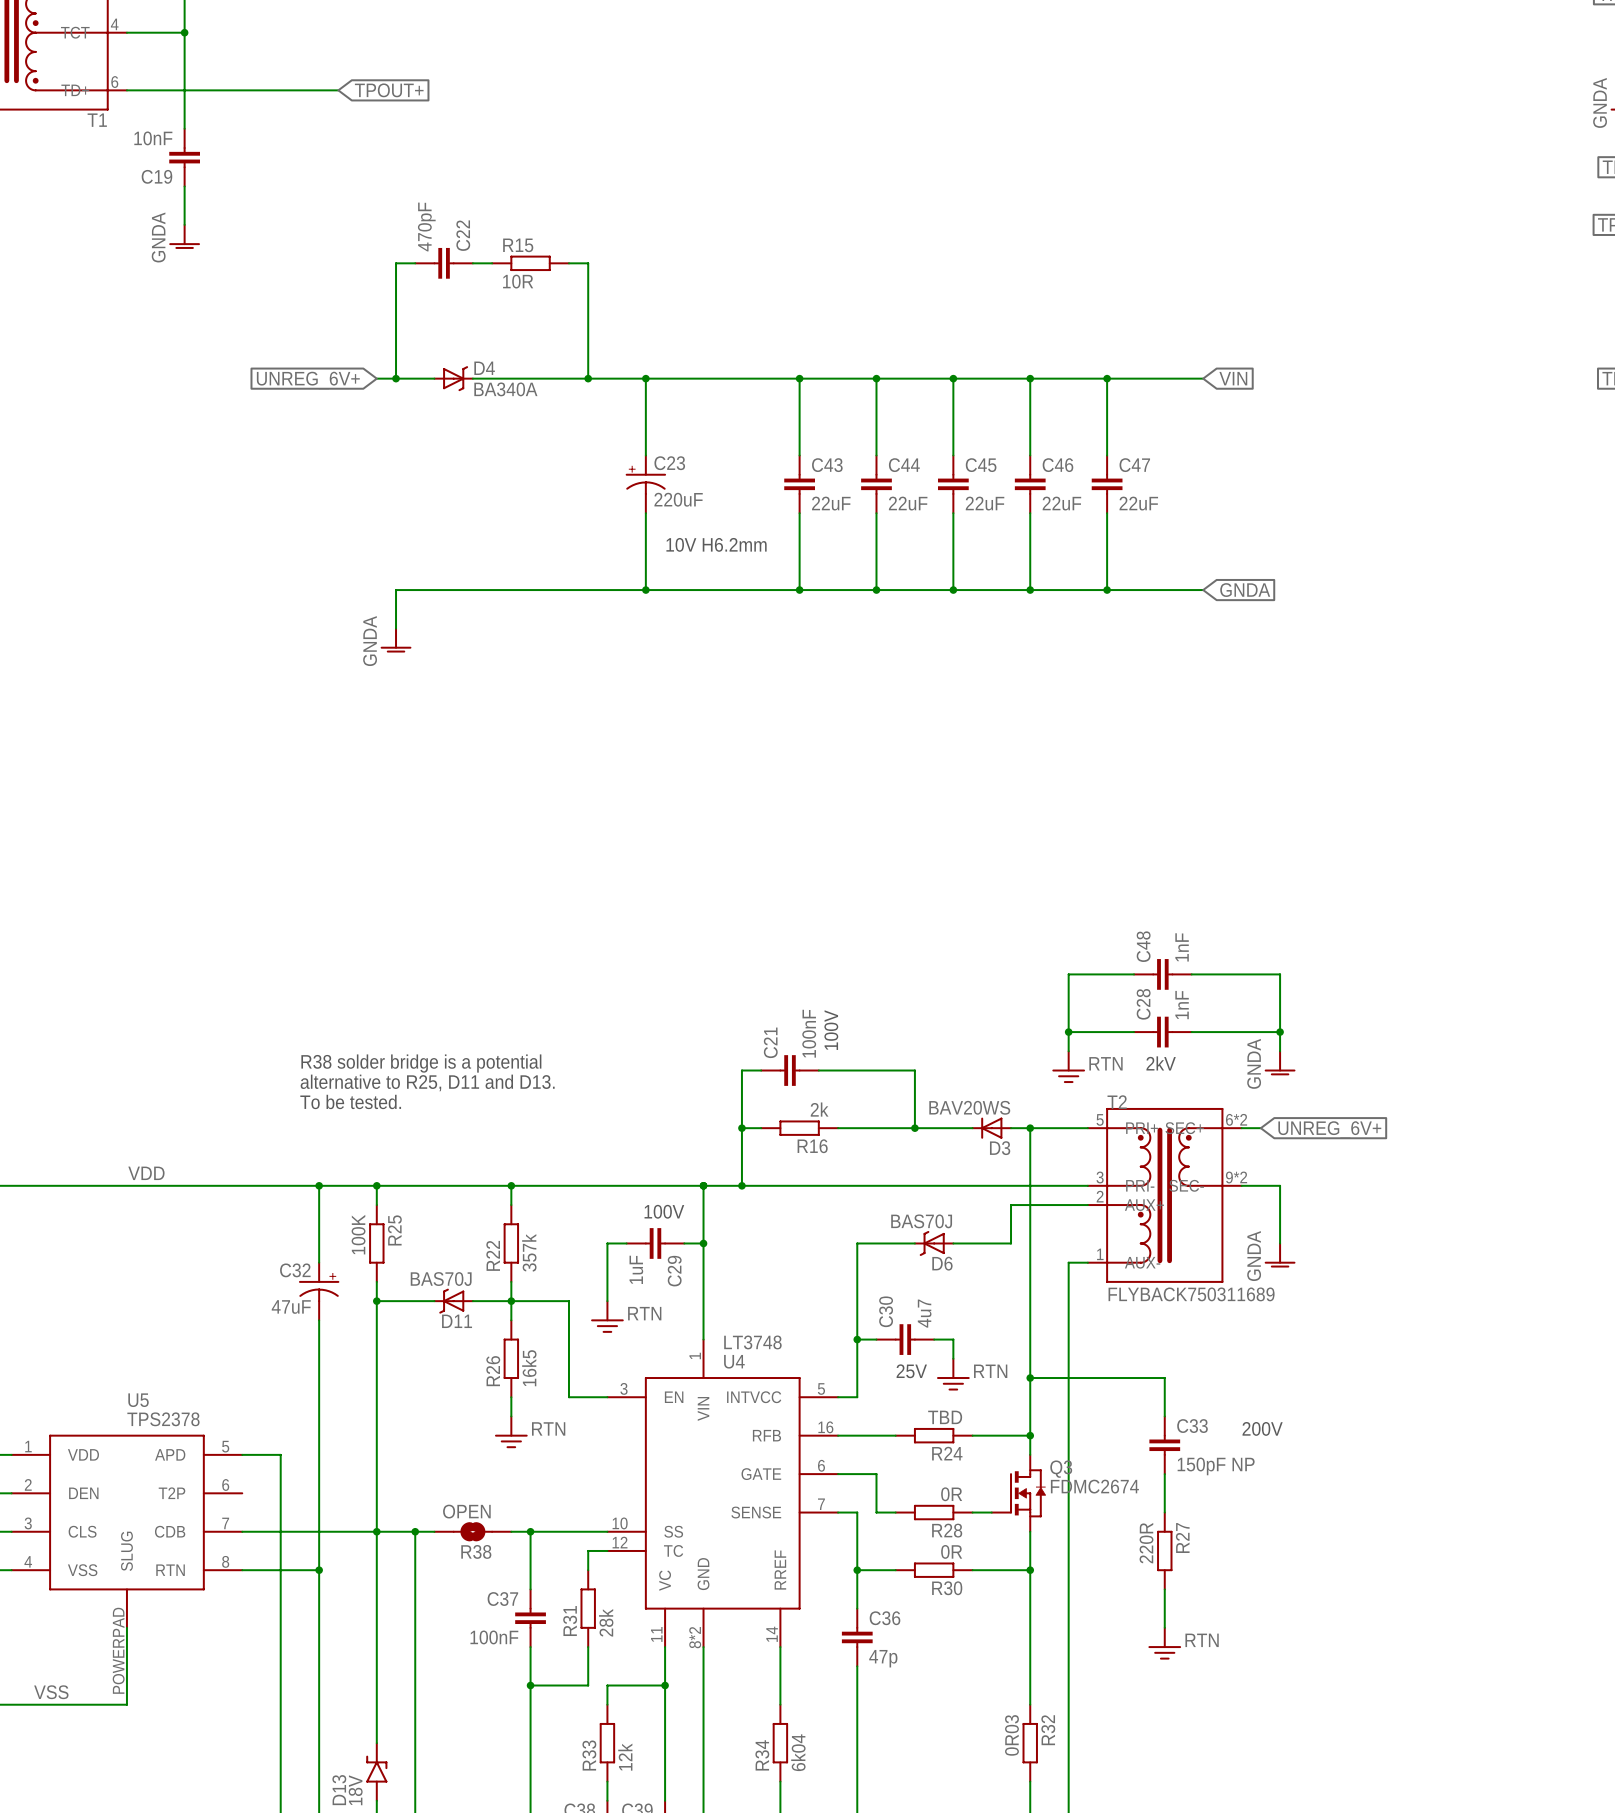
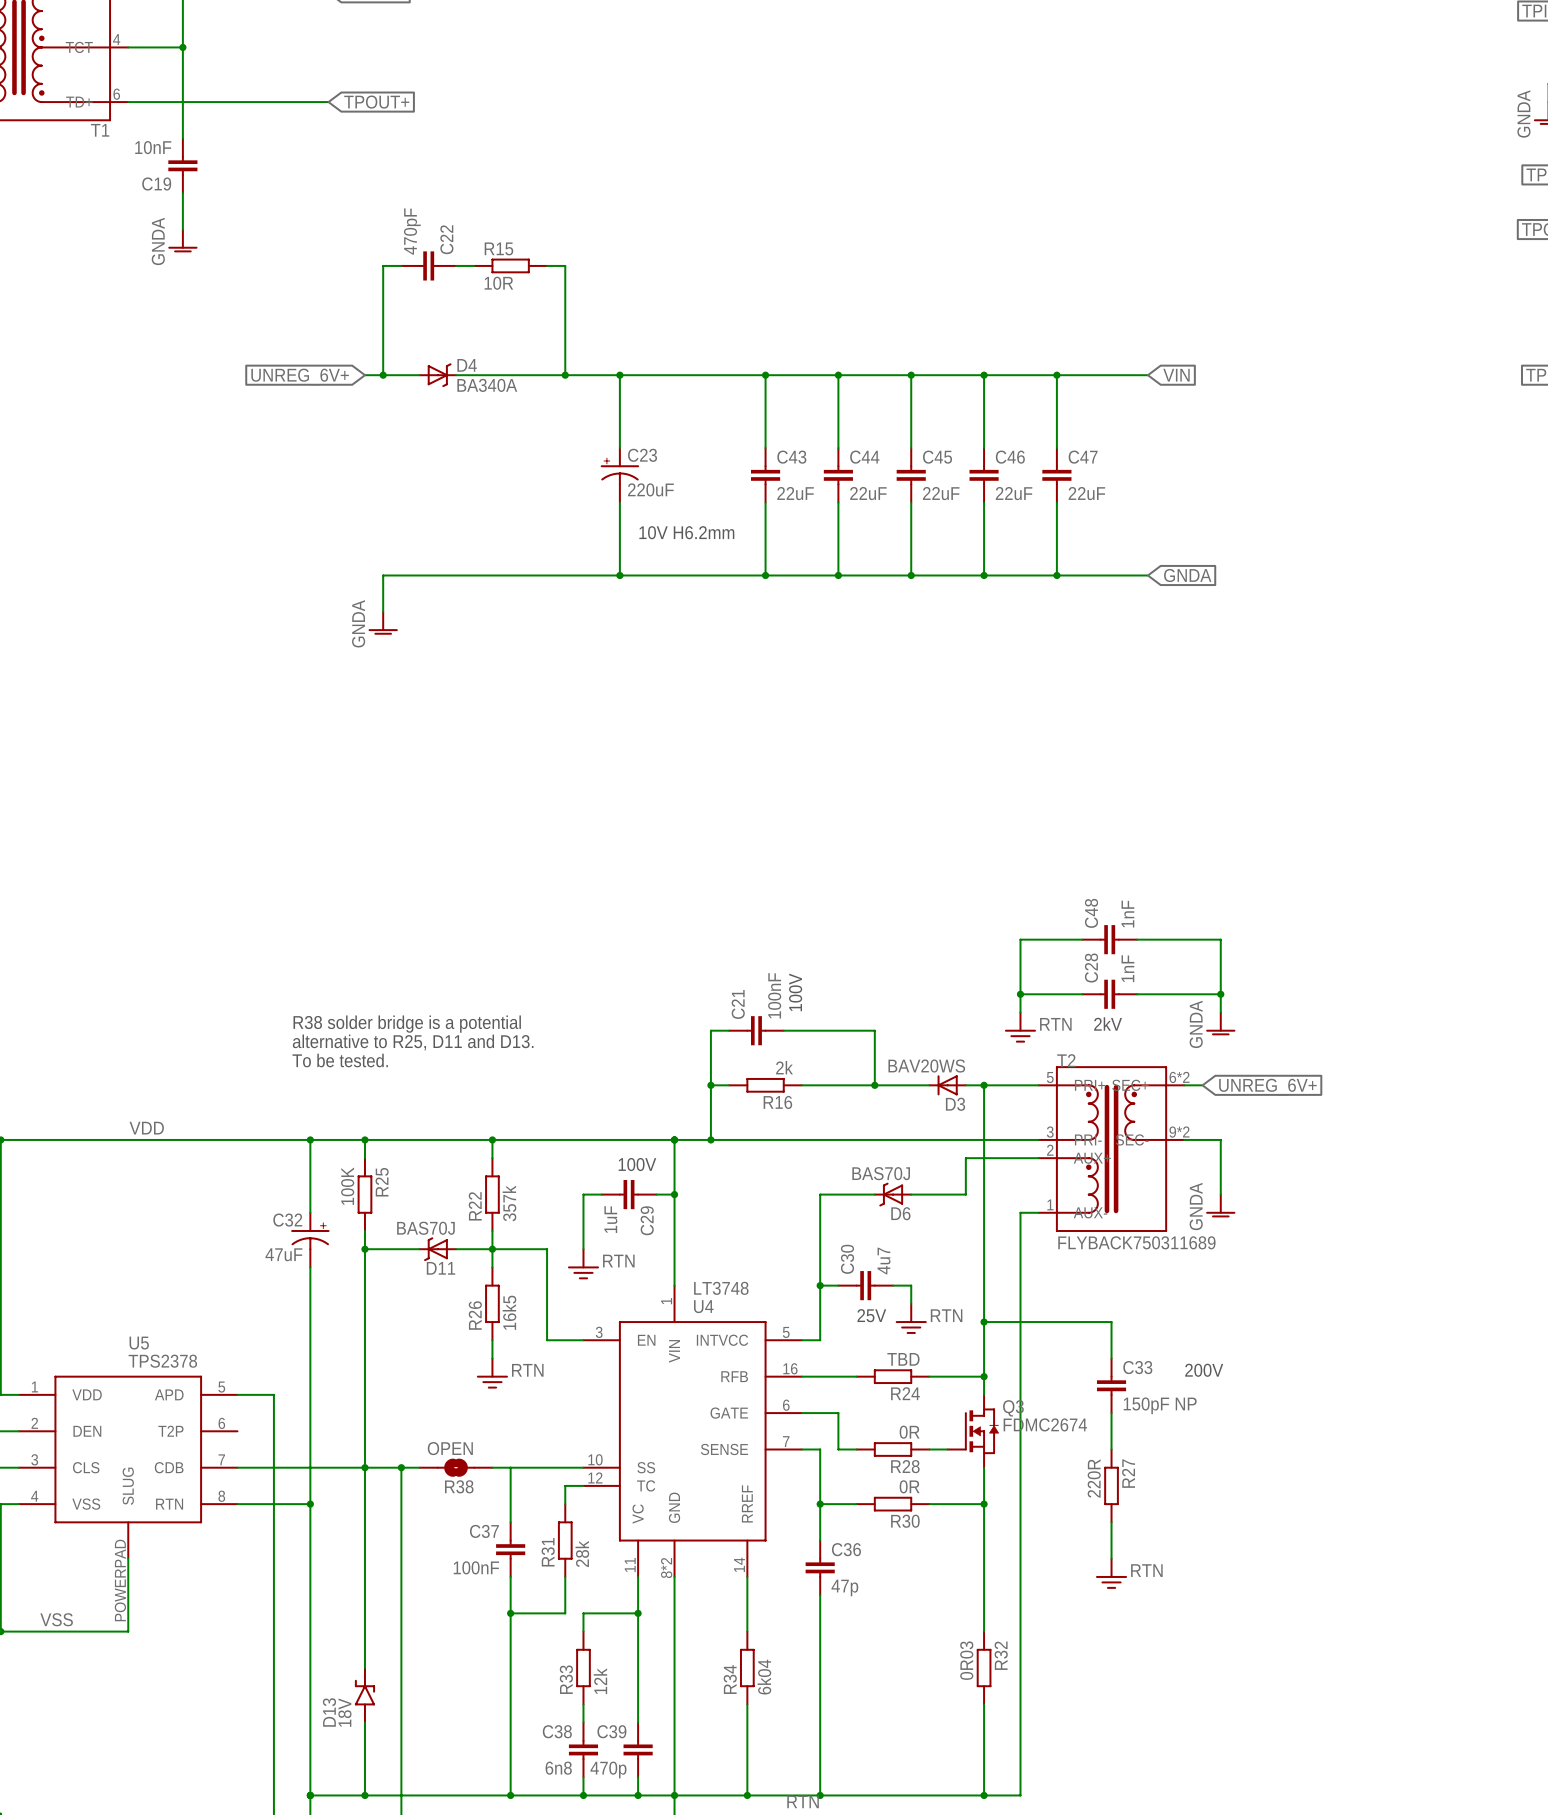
junction: (530, 1531) -> none

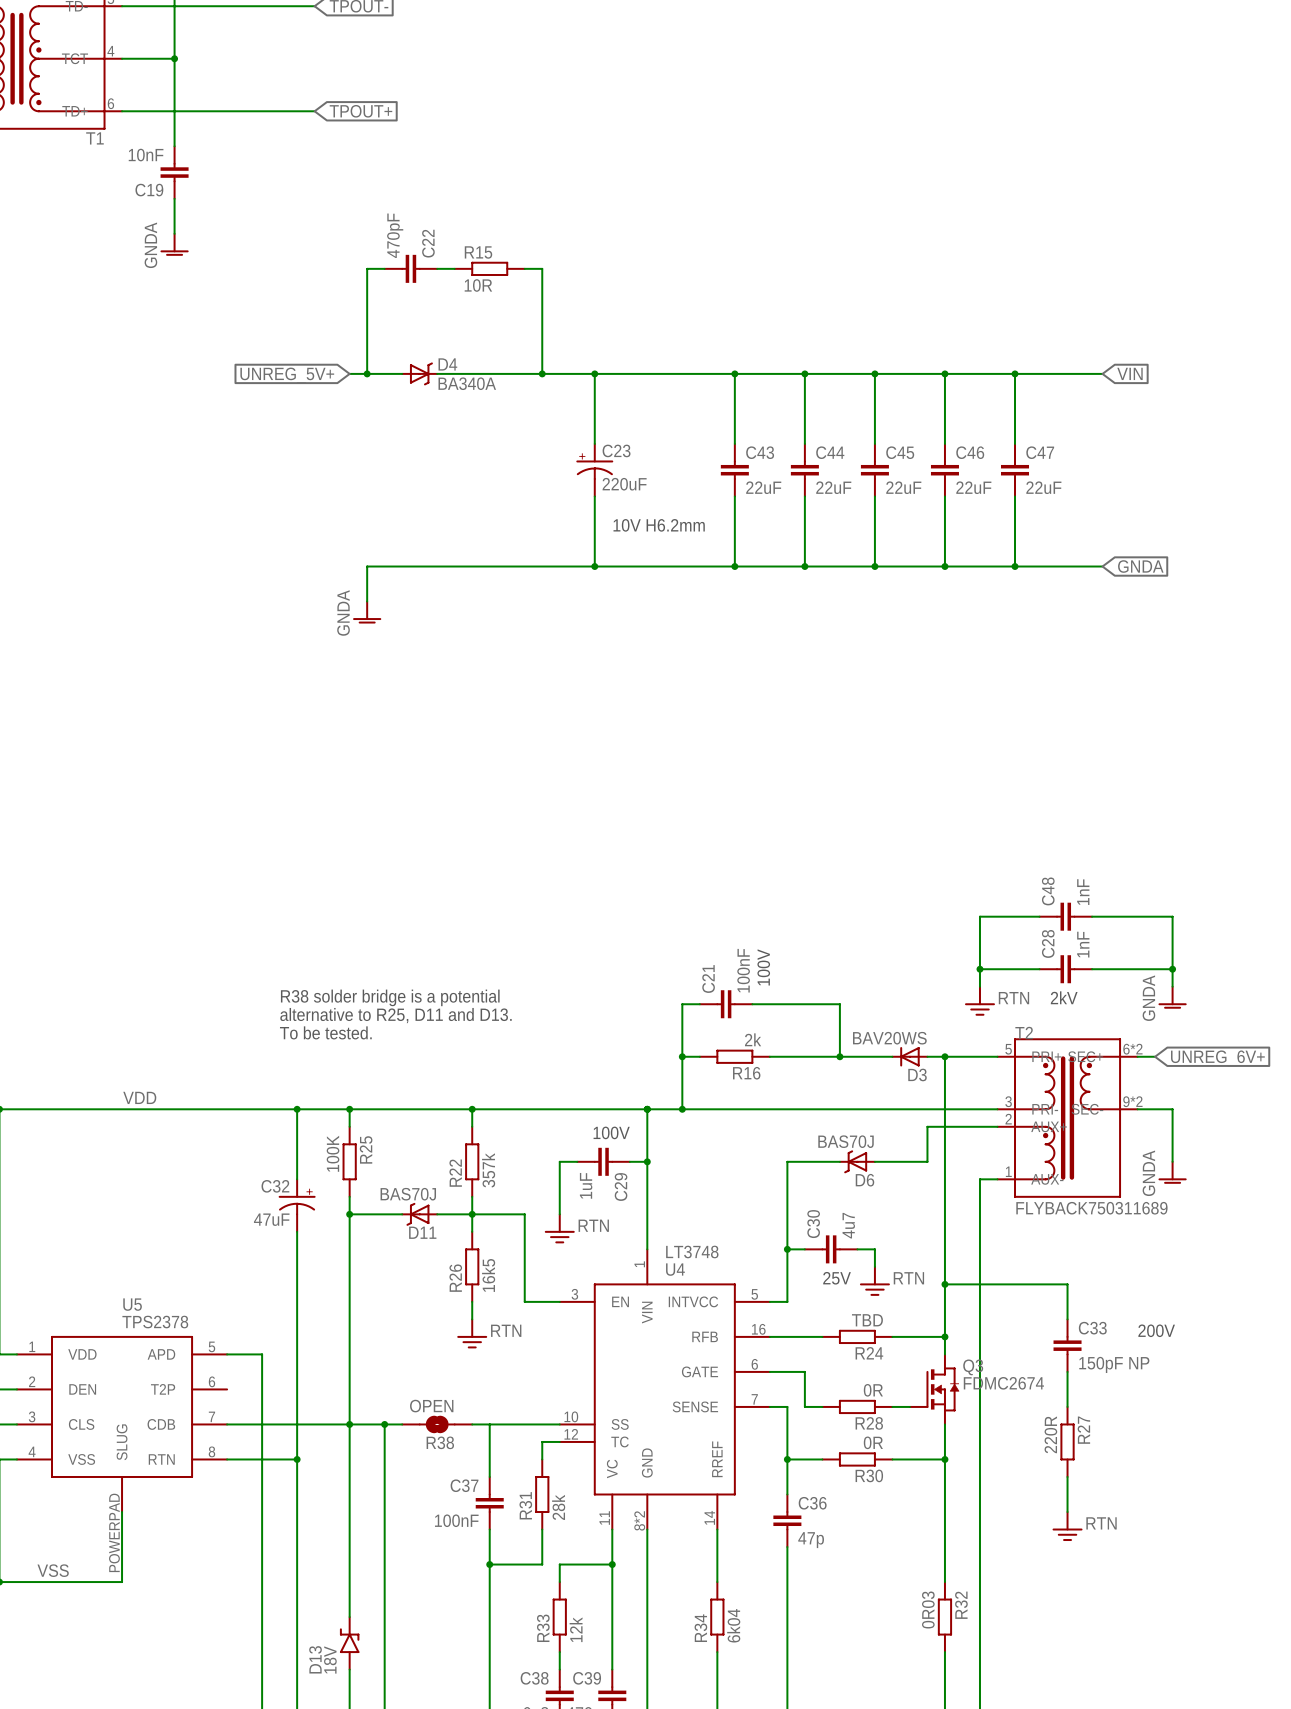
global label: UNREG_6V+ (300, 376) -> UNREG_5V+ (287, 375)

